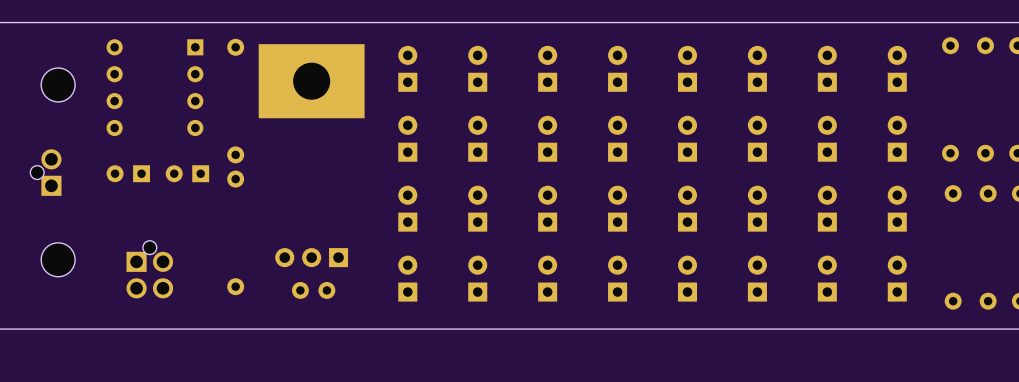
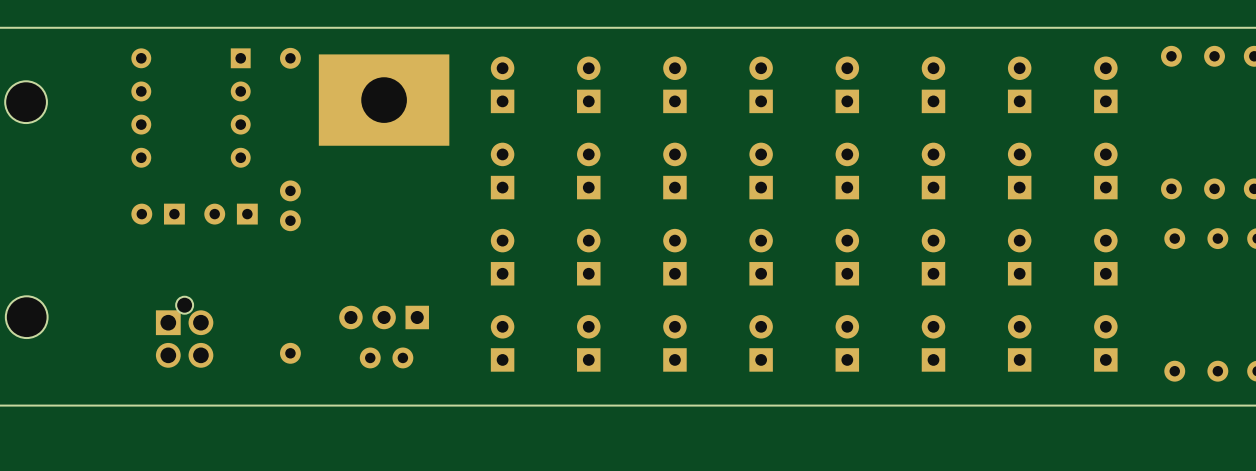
part position: (58, 84) -> (26, 102)
part: (45, 172) -> none
part position: (58, 259) -> (26, 317)

